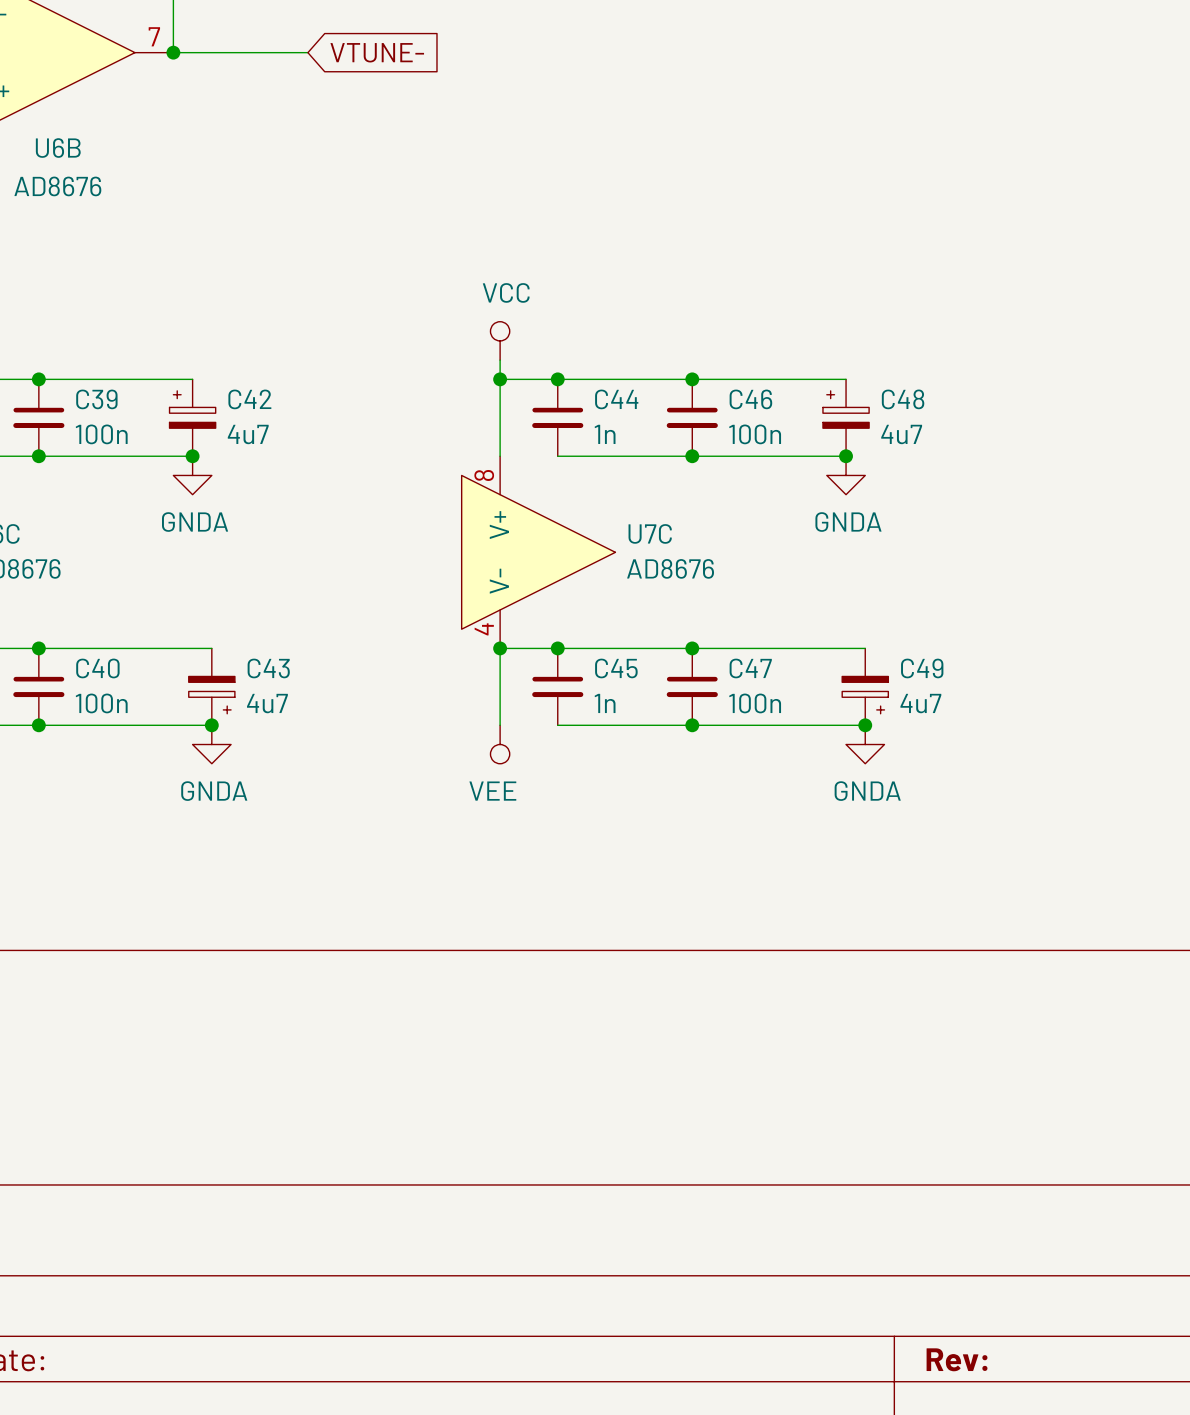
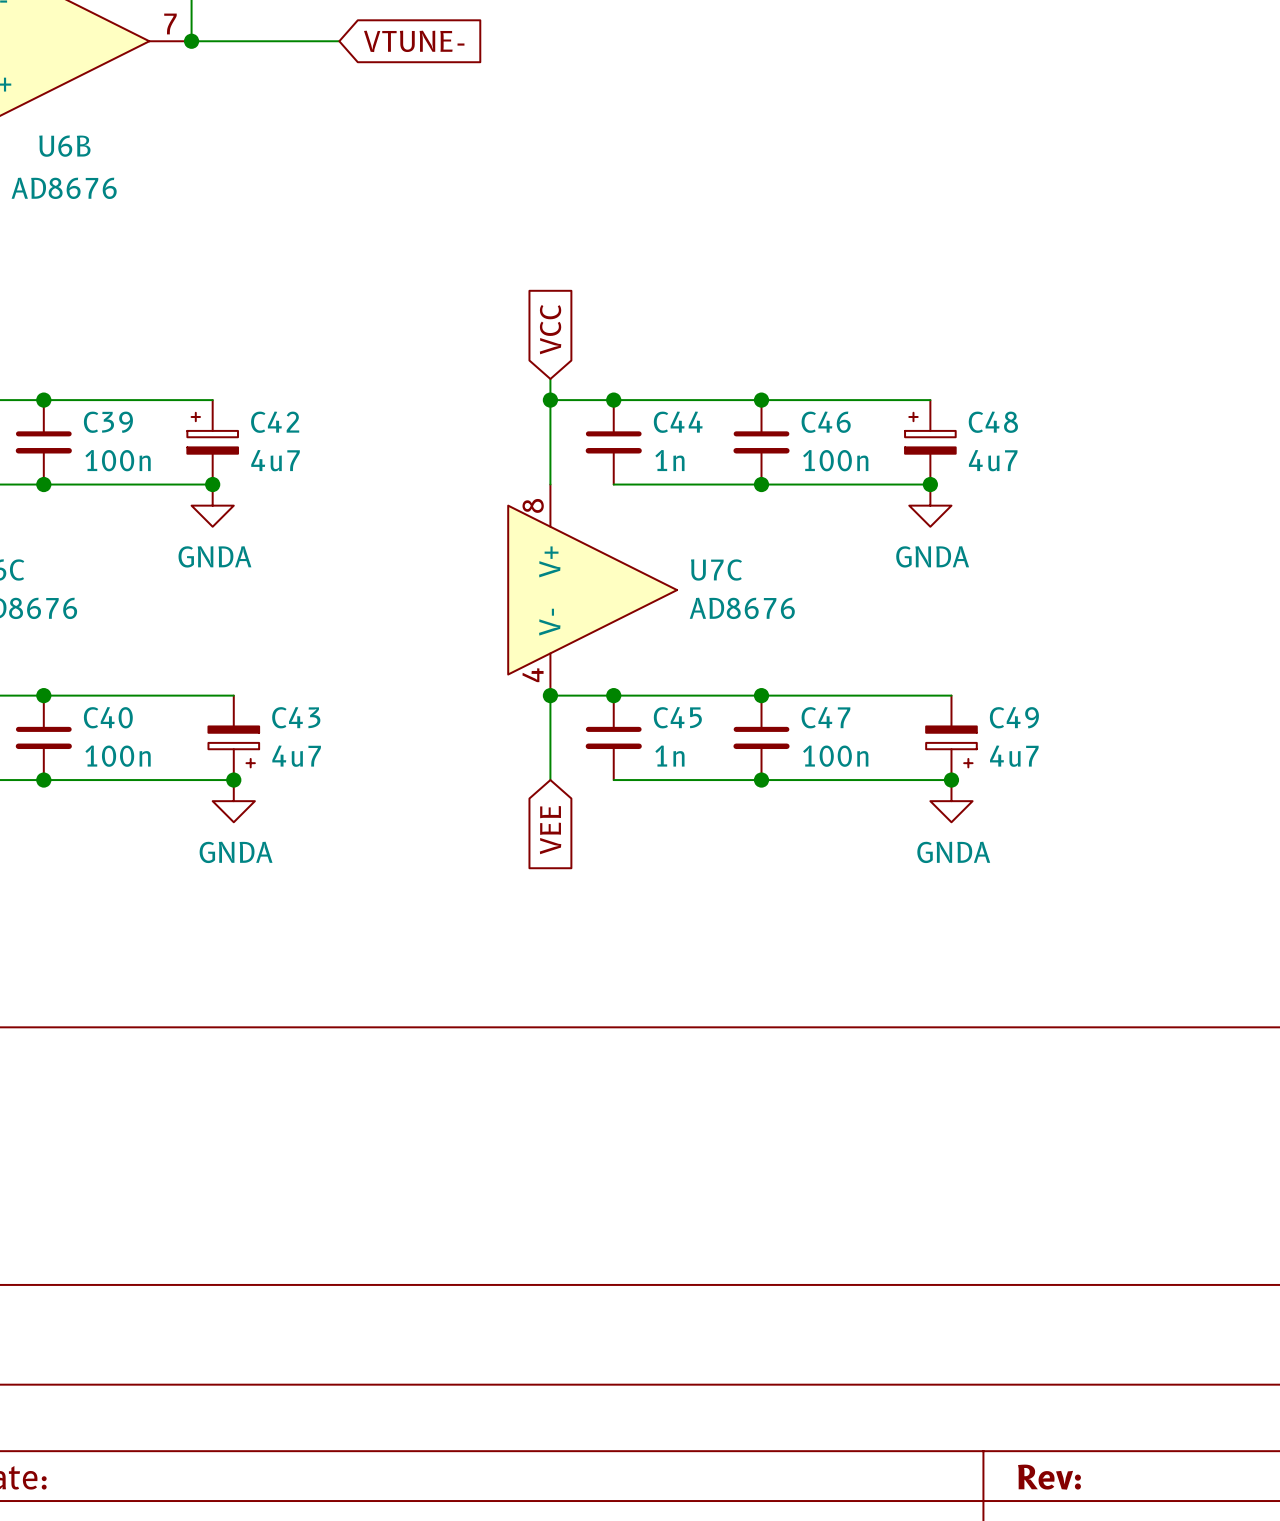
global label: none -> VCC (550, 329)
power symbol: VCC (500, 340) -> none
power symbol: VEE (500, 744) -> none
global label: none -> VEE (550, 830)

